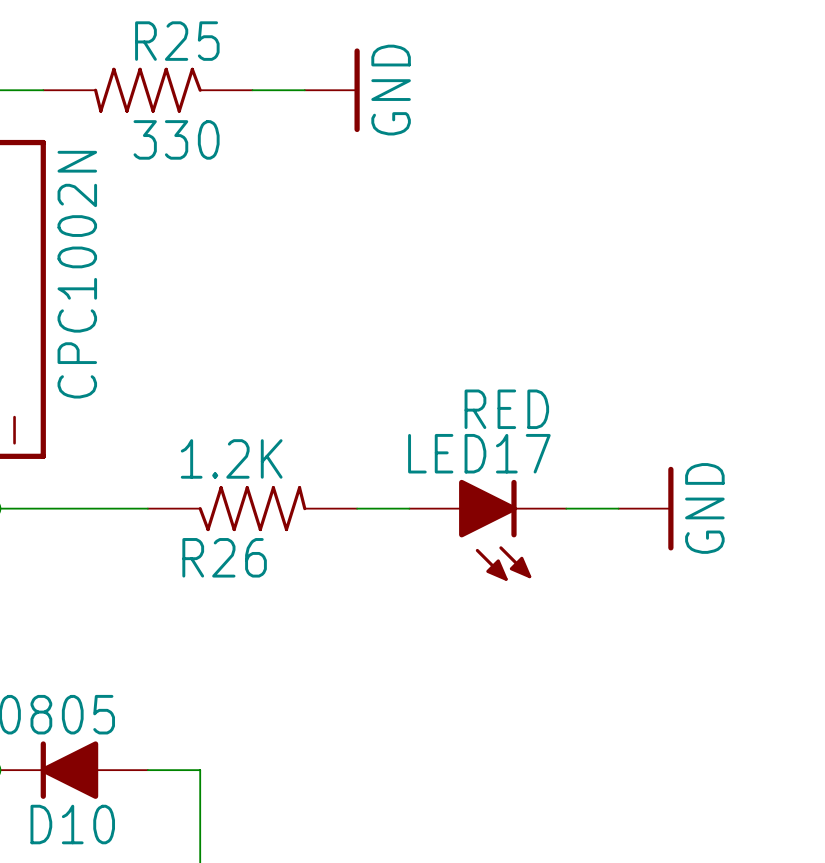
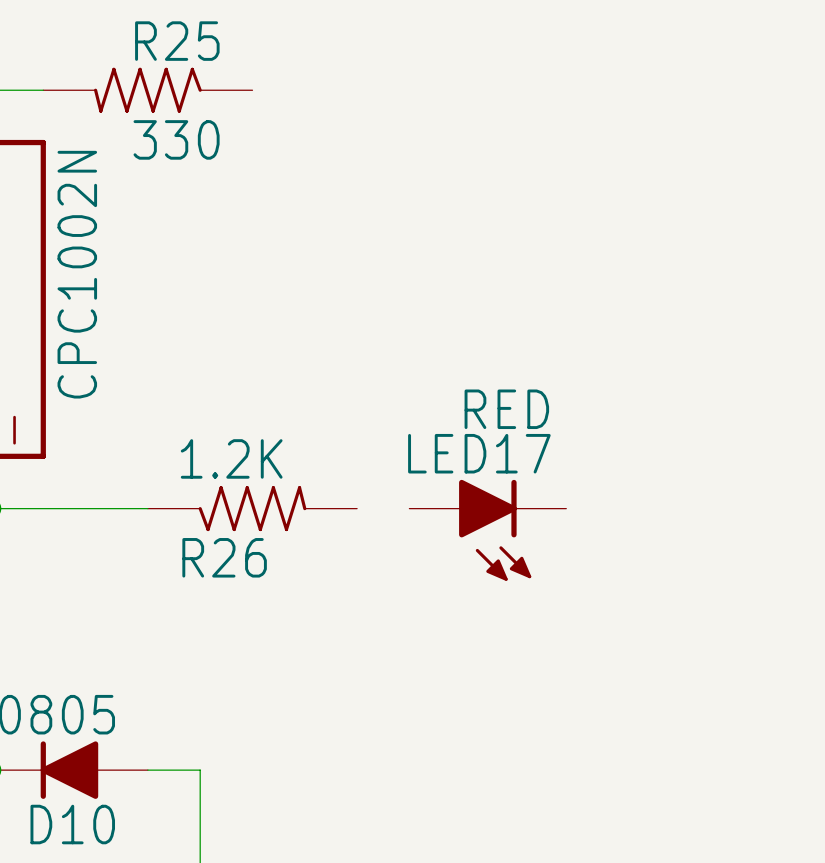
wire: (252, 90) (304, 90) -> none
power symbol: GND (332, 90) -> none
wire: (357, 508) (409, 508) -> none
wire: (566, 508) (618, 508) -> none
power symbol: GND (646, 508) -> none

